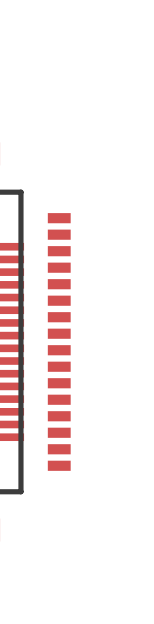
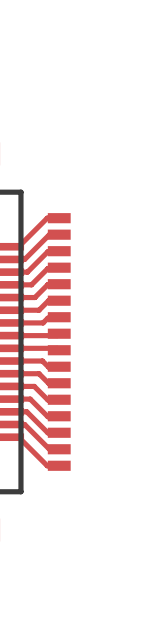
track: none -> (59, 218) (47, 218) (18, 246) (8, 246)
track: none -> (59, 234) (49, 234) (24, 259) (8, 259)
track: none -> (59, 251) (47, 251) (27, 272) (8, 272)
track: none -> (59, 267) (47, 268) (31, 284) (8, 284)
track: none -> (59, 284) (47, 284) (34, 297) (8, 297)
track: none -> (59, 300) (48, 300) (39, 310) (8, 310)
track: none -> (59, 317) (47, 318) (43, 322) (8, 322)
track: none -> (59, 333) (57, 335) (8, 335)
track: none -> (8, 348) (57, 348) (59, 350)
track: none -> (8, 361) (42, 361) (48, 367) (59, 366)
track: none -> (8, 373) (39, 373) (48, 383) (59, 383)
track: none -> (8, 386) (34, 386) (47, 400) (58, 400)
track: none -> (8, 399) (30, 399) (47, 416) (59, 416)
track: none -> (8, 411) (26, 411) (47, 432) (59, 432)
track: none -> (8, 424) (24, 424) (49, 449) (59, 449)
track: none -> (8, 437) (18, 437) (47, 465) (59, 465)

